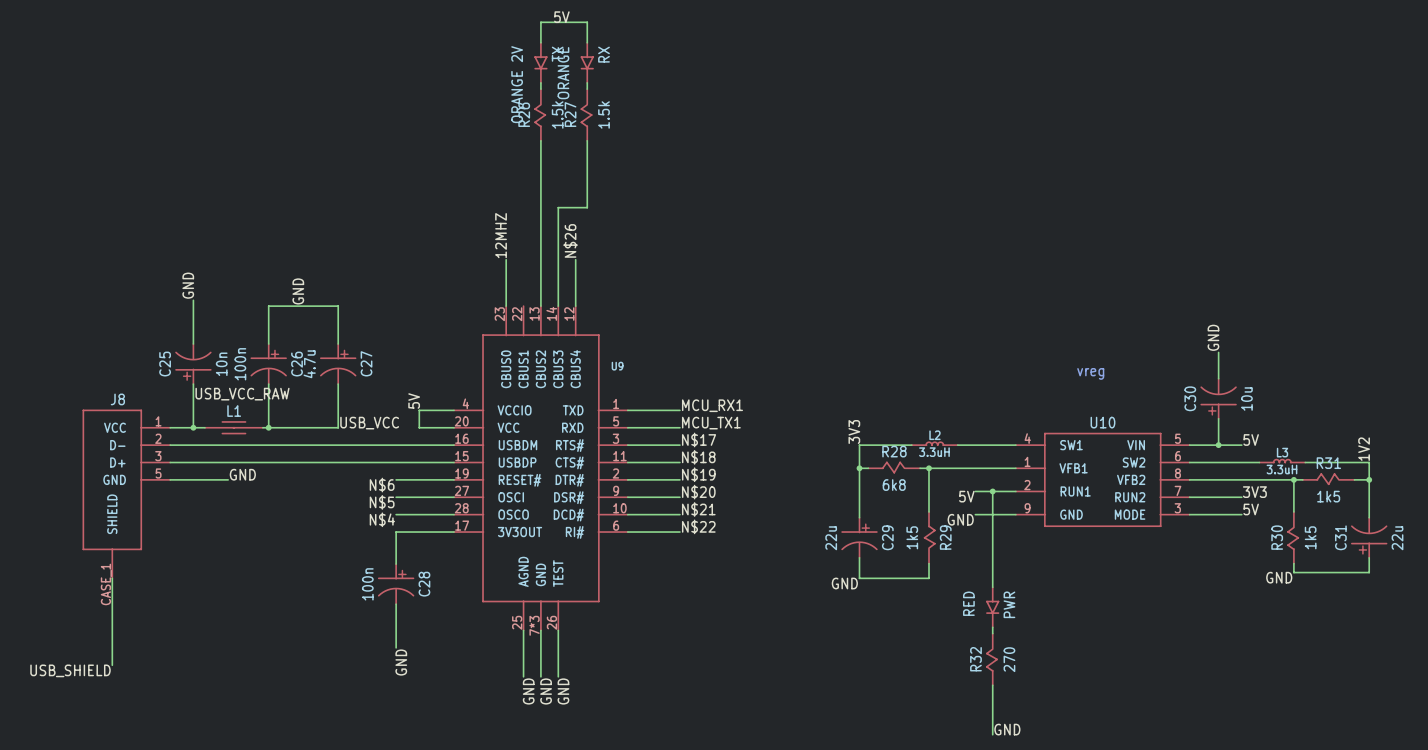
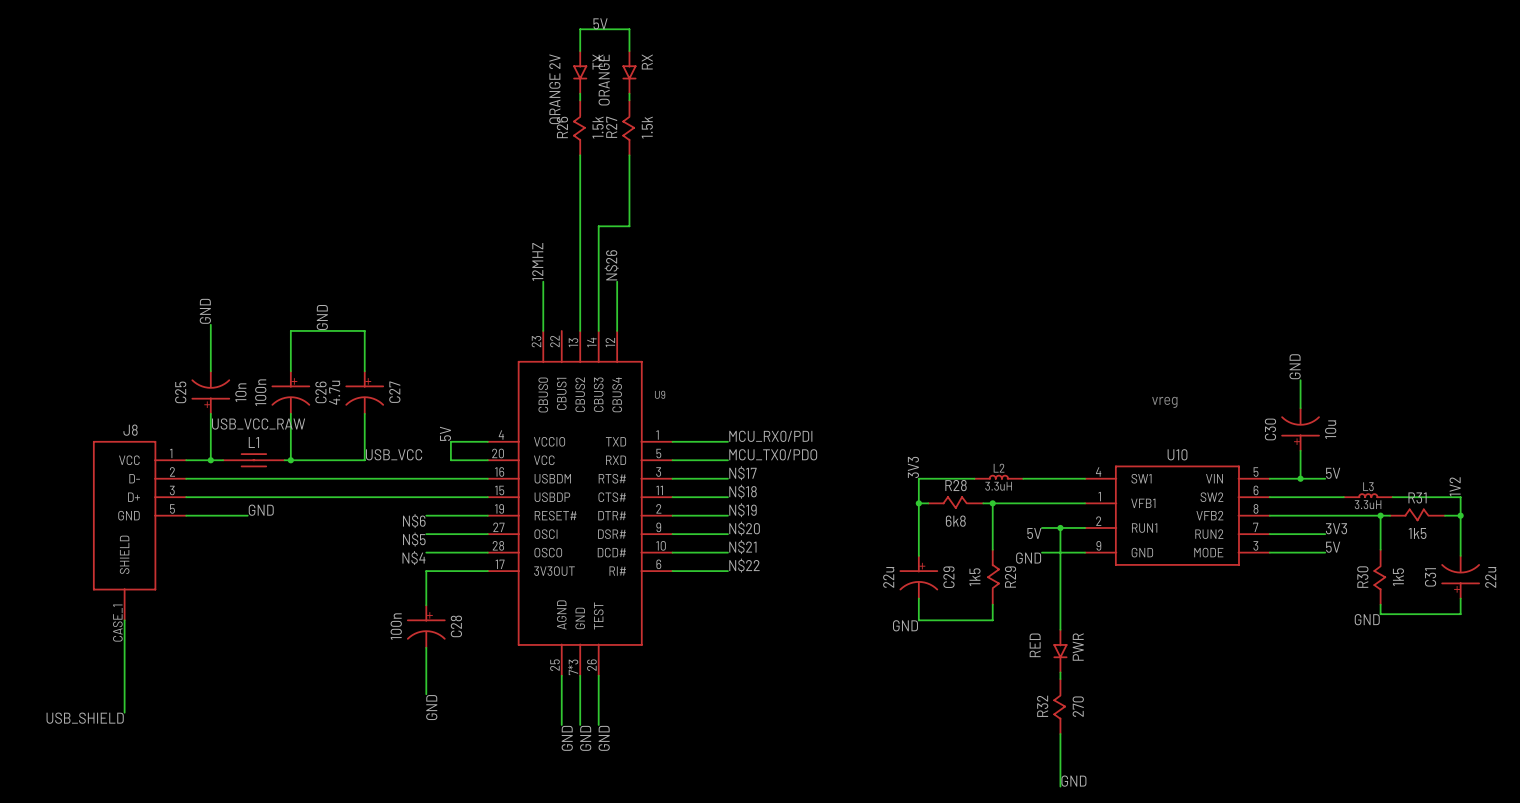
label: MCU_RX1 (712, 405) -> MCU_RX0/PDI (770, 436)
label: MCU_TX1 (711, 423) -> MCU_TX0/PDO (773, 454)

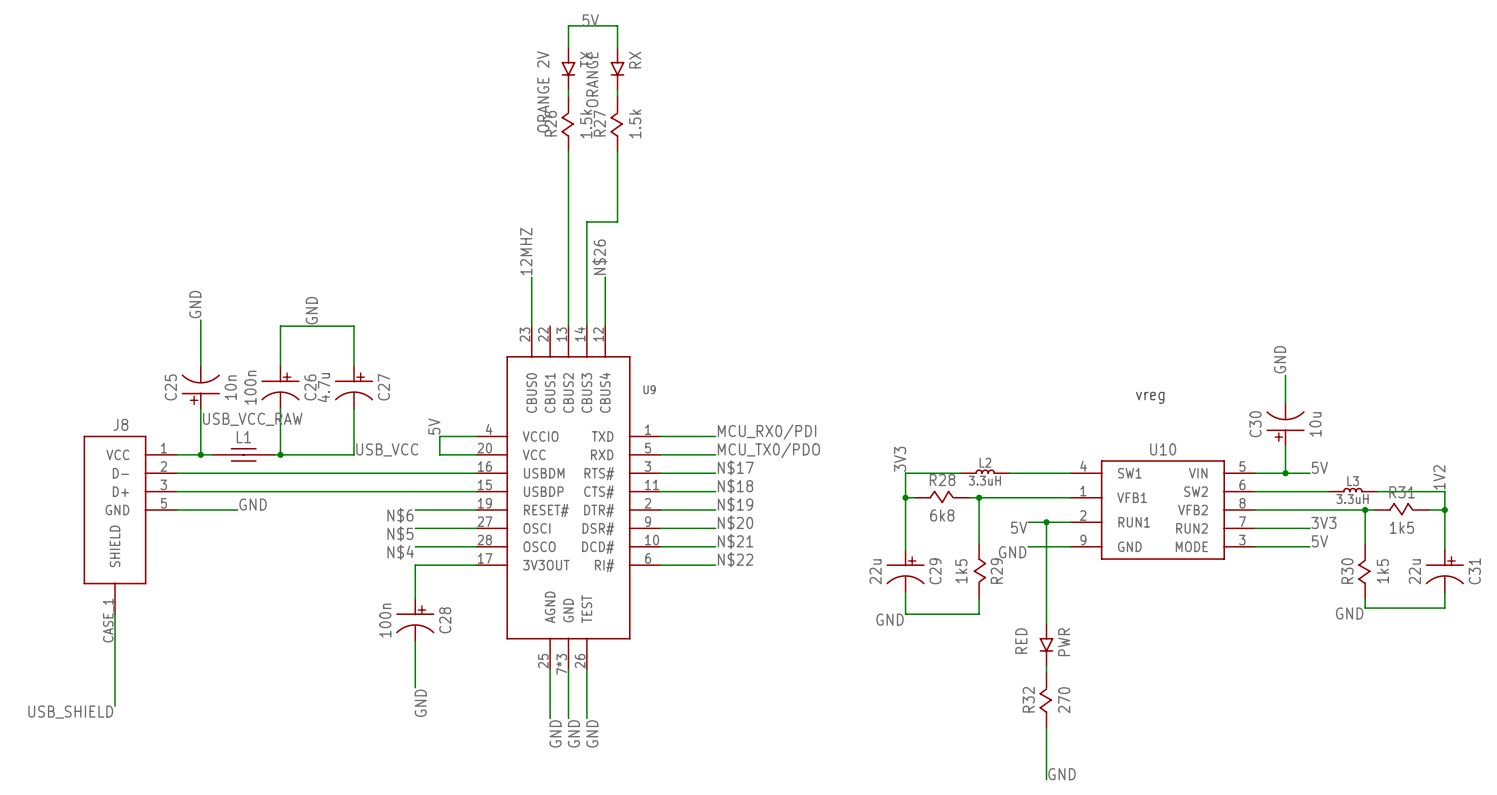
C31 symbol: [1441, 555, 1480, 599] -> [1425, 550, 1465, 593]
C31 name position: C31 (1430, 577) -> C31 (1474, 571)
C31 value position: 22u (1490, 577) -> 22u (1414, 571)

